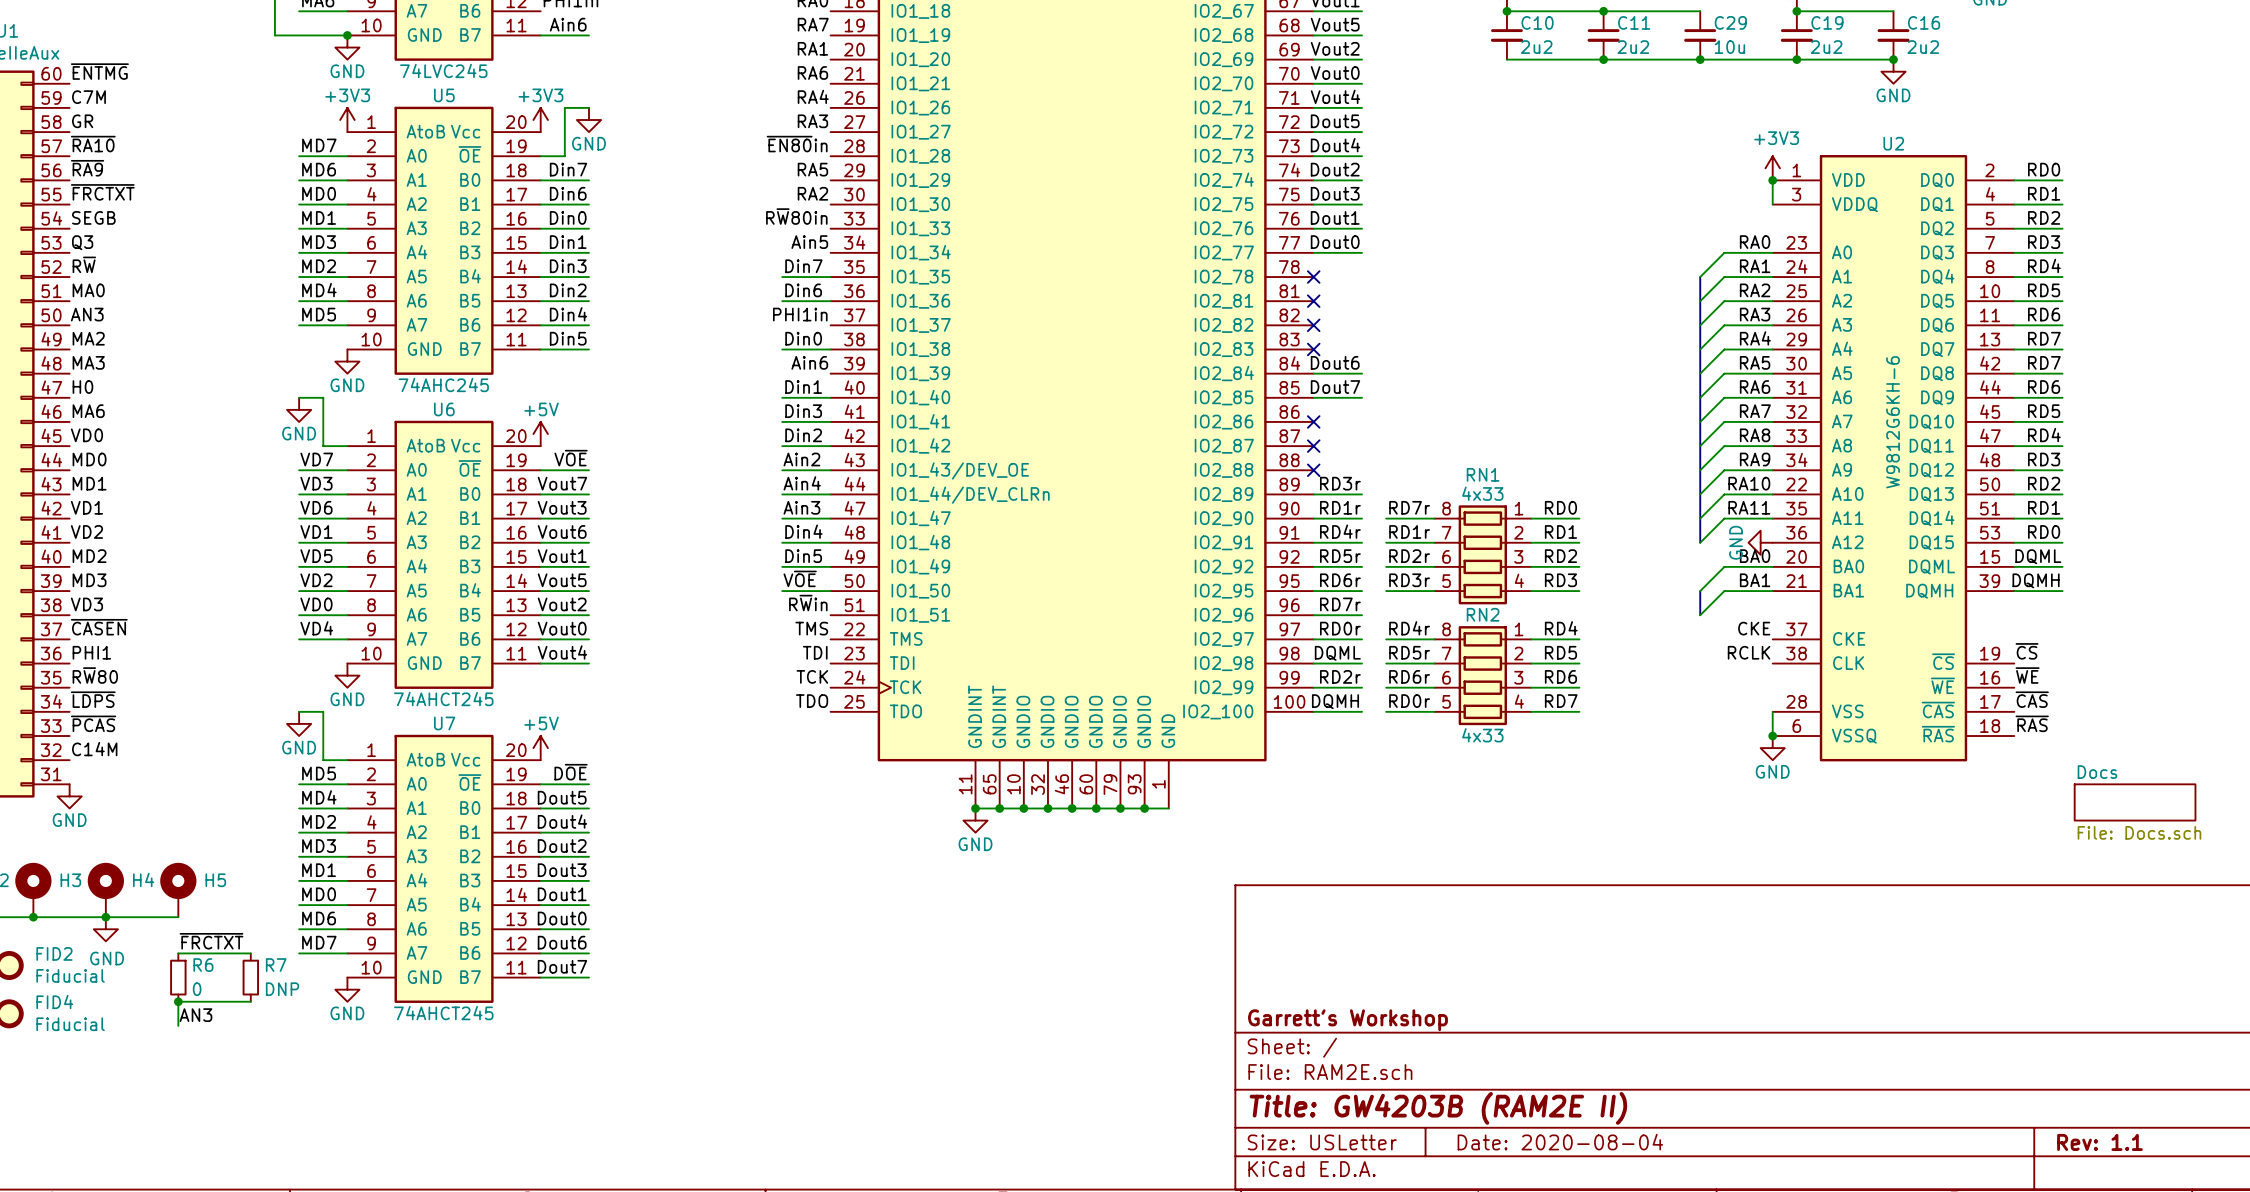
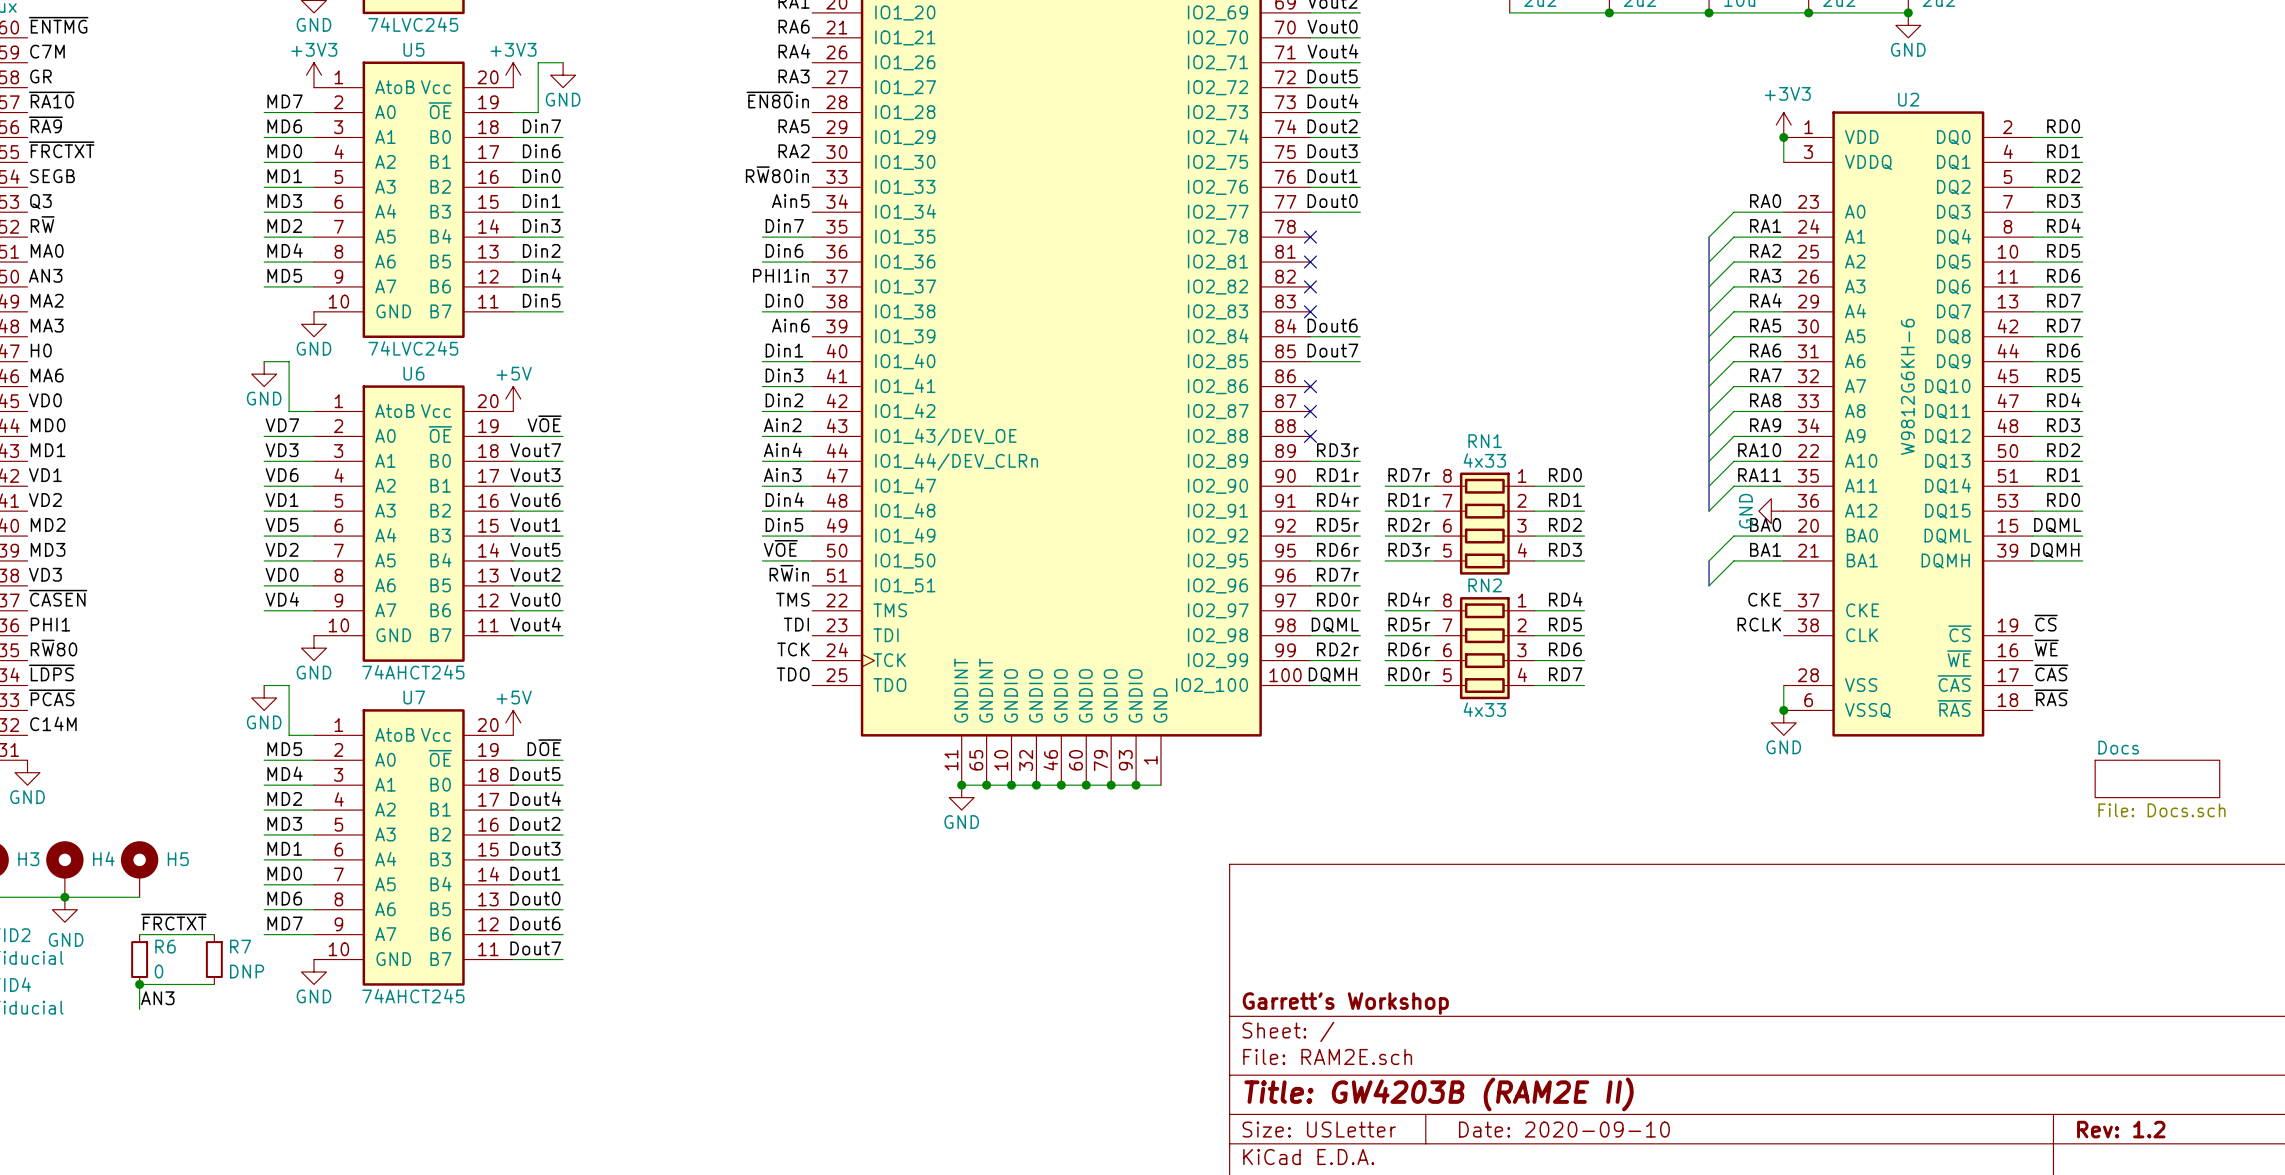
U5 value: 74AHC245 (443, 384) -> 74LVC245 (413, 348)
title block: Date: 2020-08-04 (1560, 1142) -> Date: 2020-09-10 (1564, 1129)
title block: Rev: 1.1 (2099, 1142) -> Rev: 1.2 (2121, 1129)

